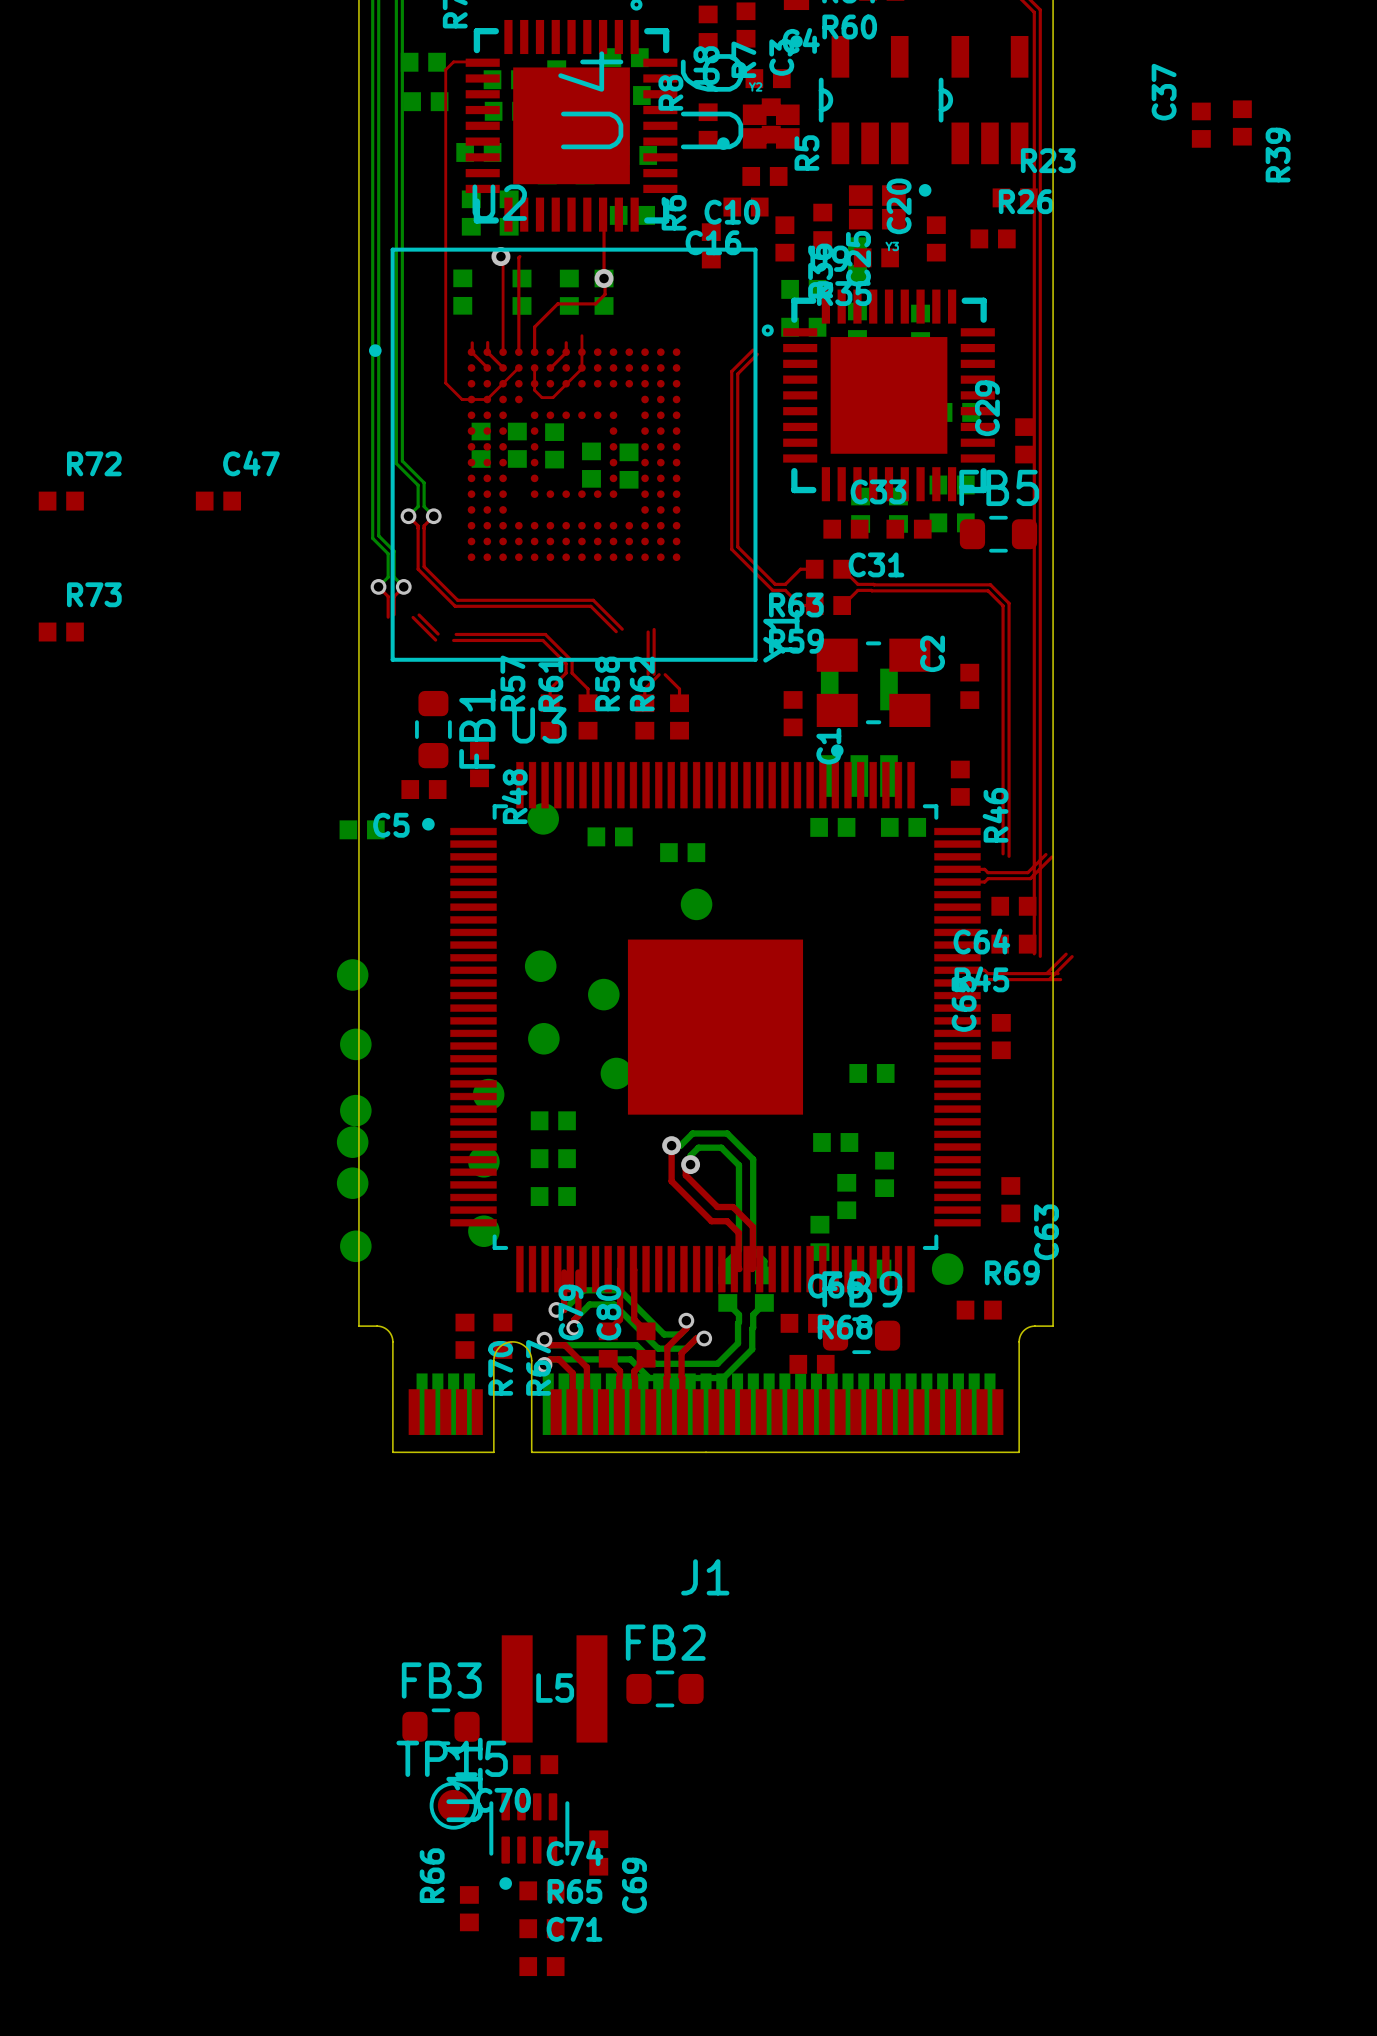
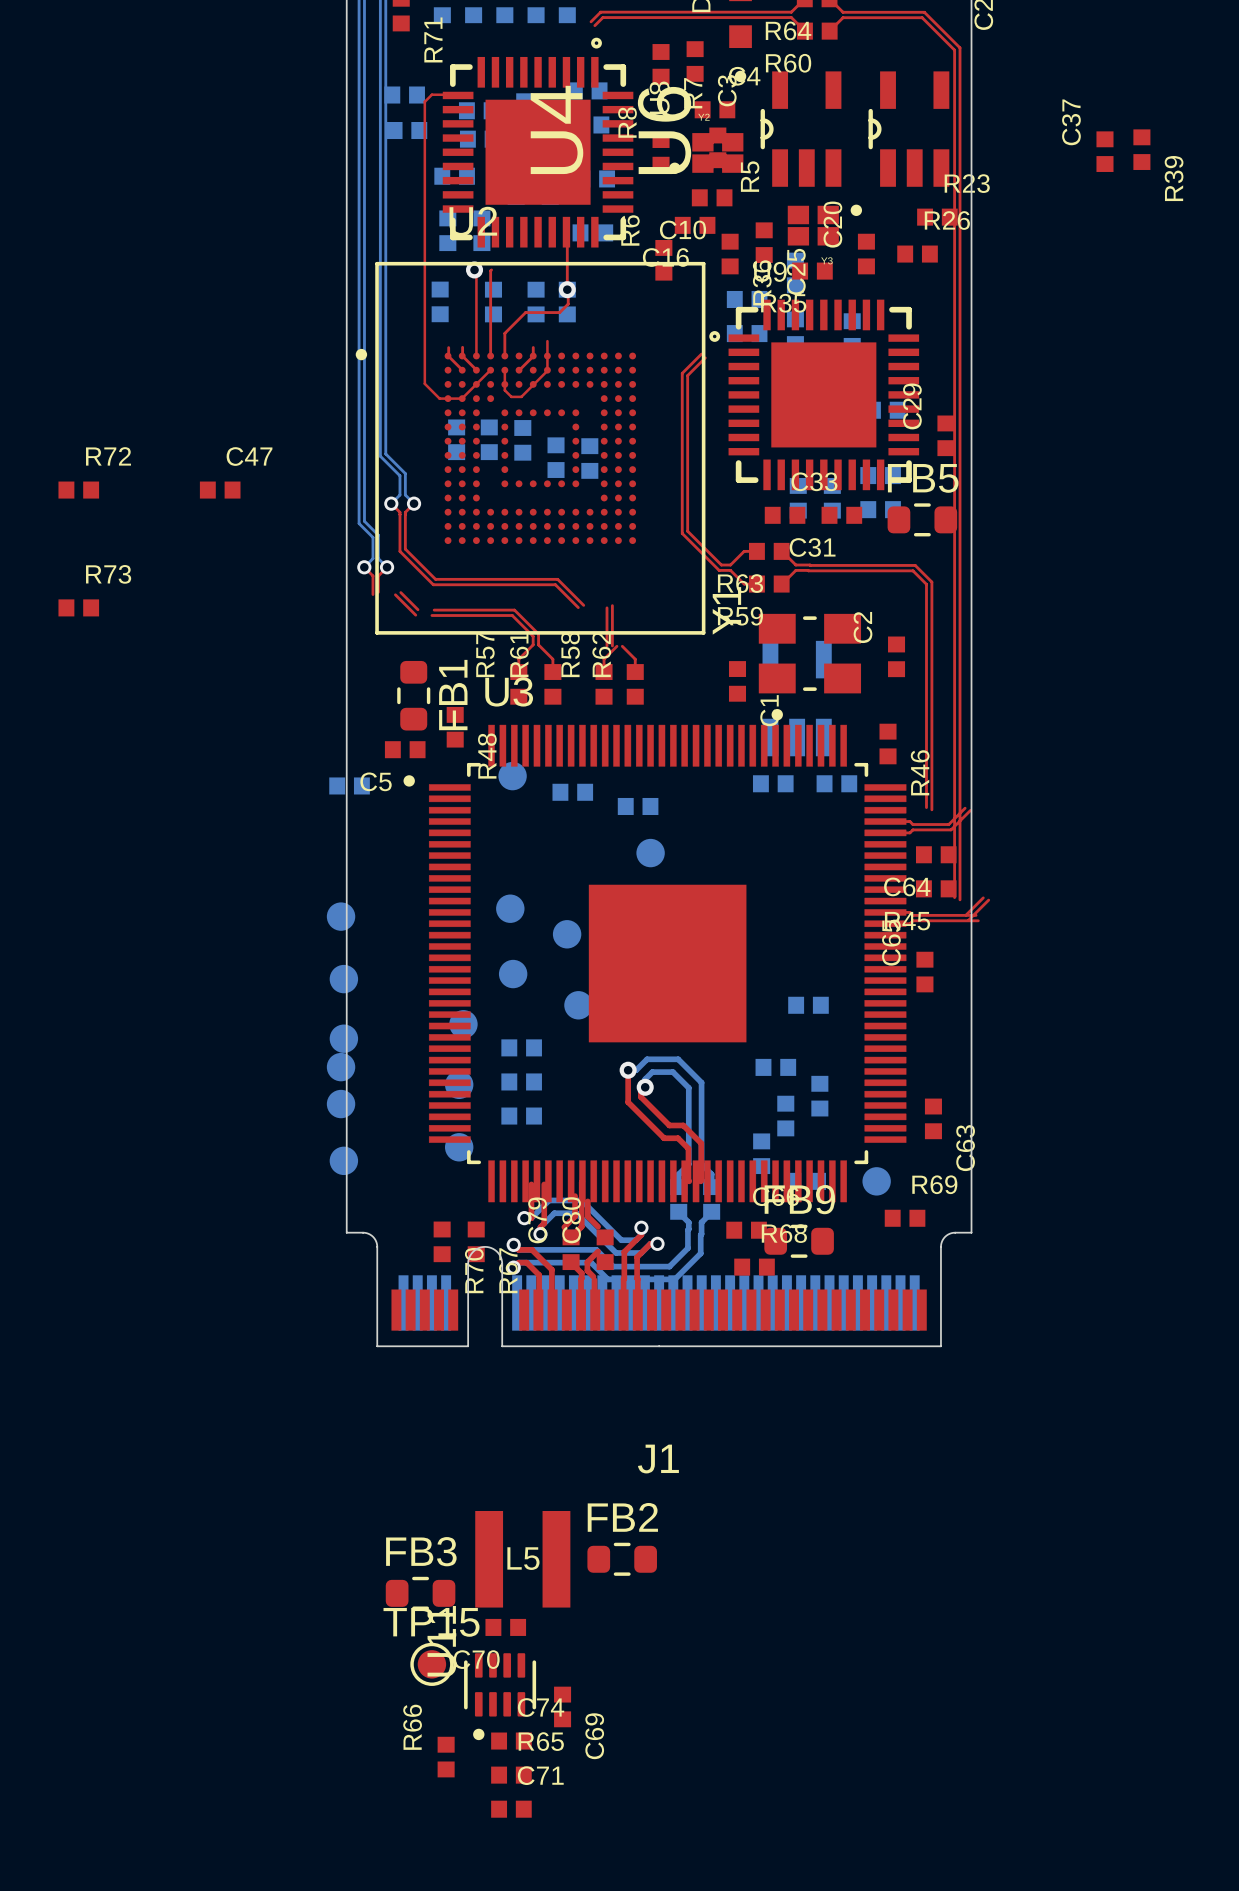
top track: (633, 1269) (634, 1319) (646, 1331) -> none
top track: none -> (575, 1196) (575, 1216) (564, 1227)
top track: none -> (587, 1201) (587, 1216) (598, 1226)
top track: none -> (598, 1251) (587, 1262) (587, 1270) (593, 1276)
top track: (646, 1359) (634, 1371) (635, 1394) -> (594, 1280) (595, 1294)

